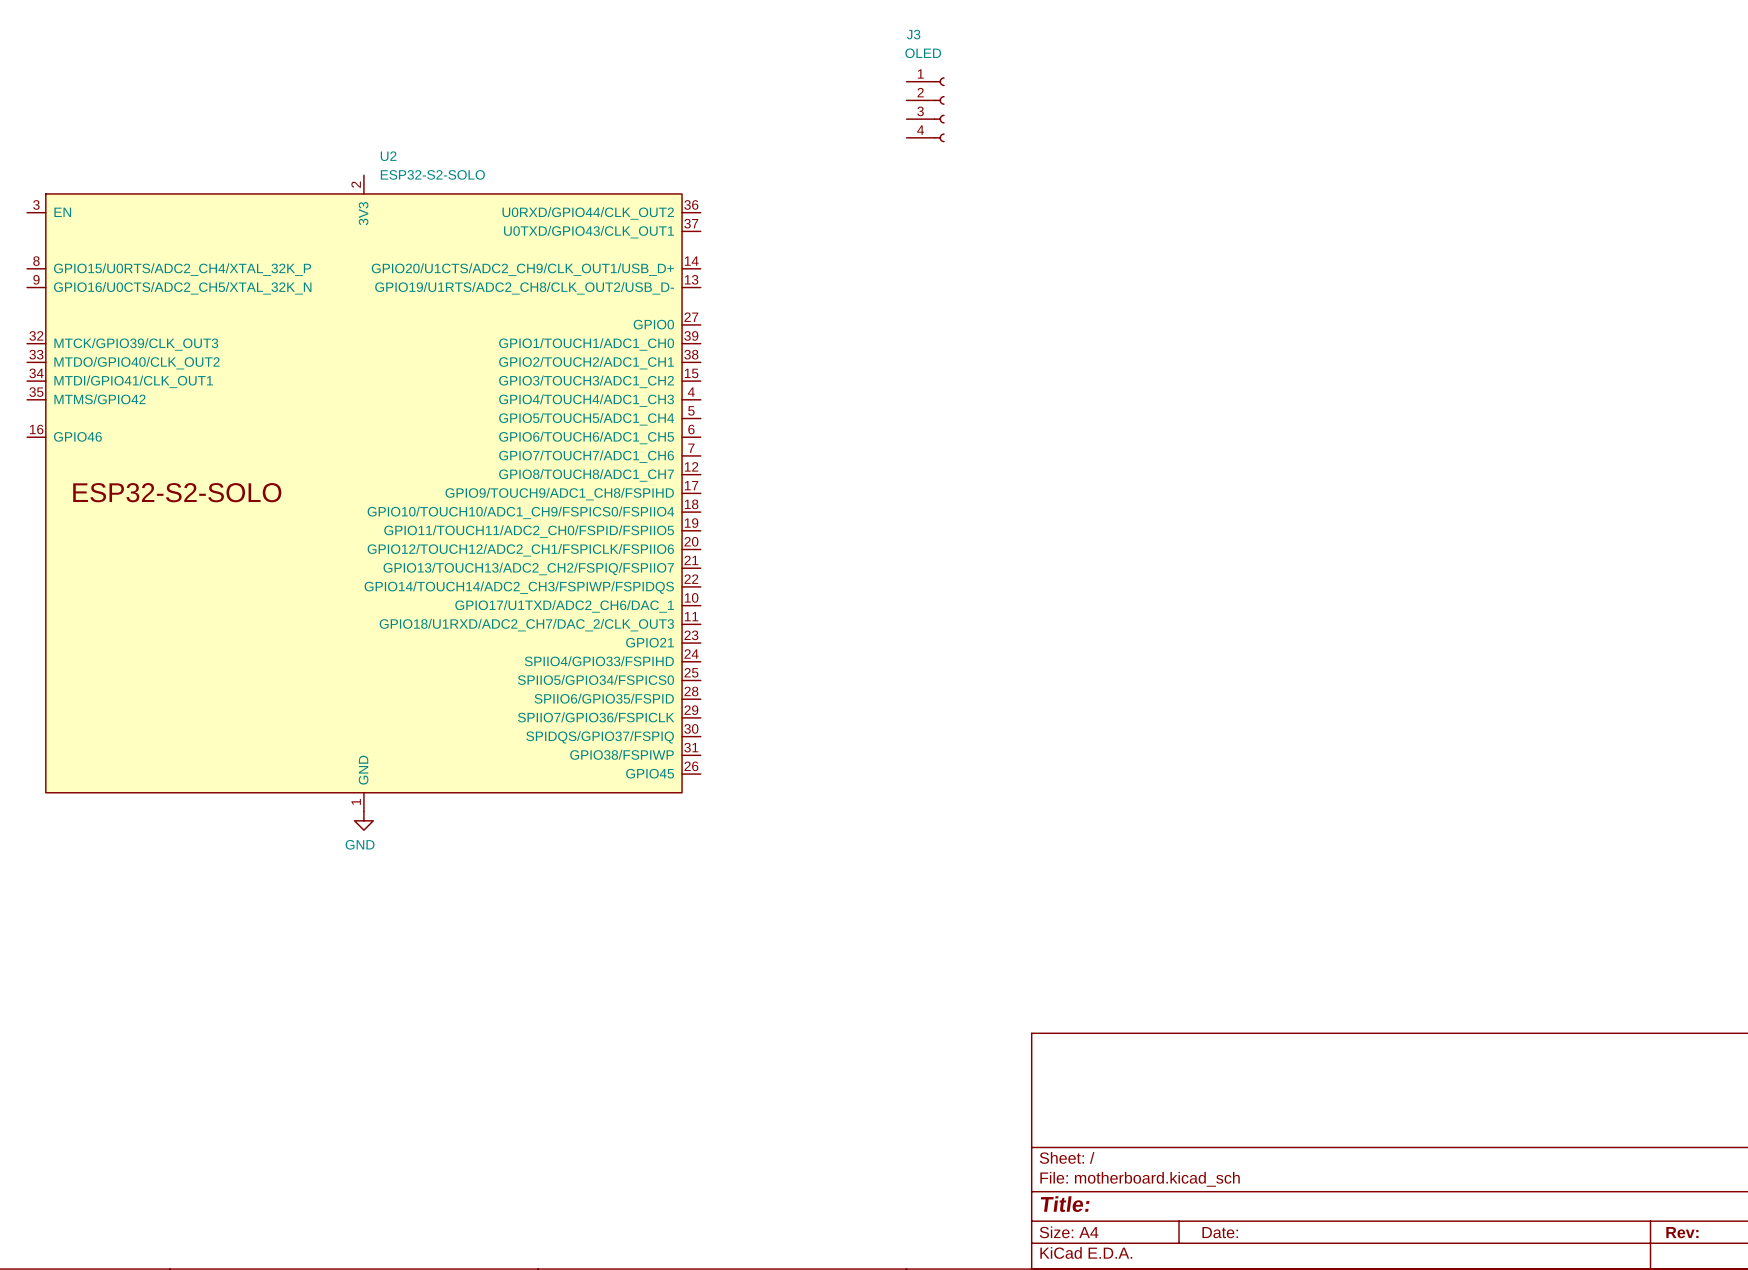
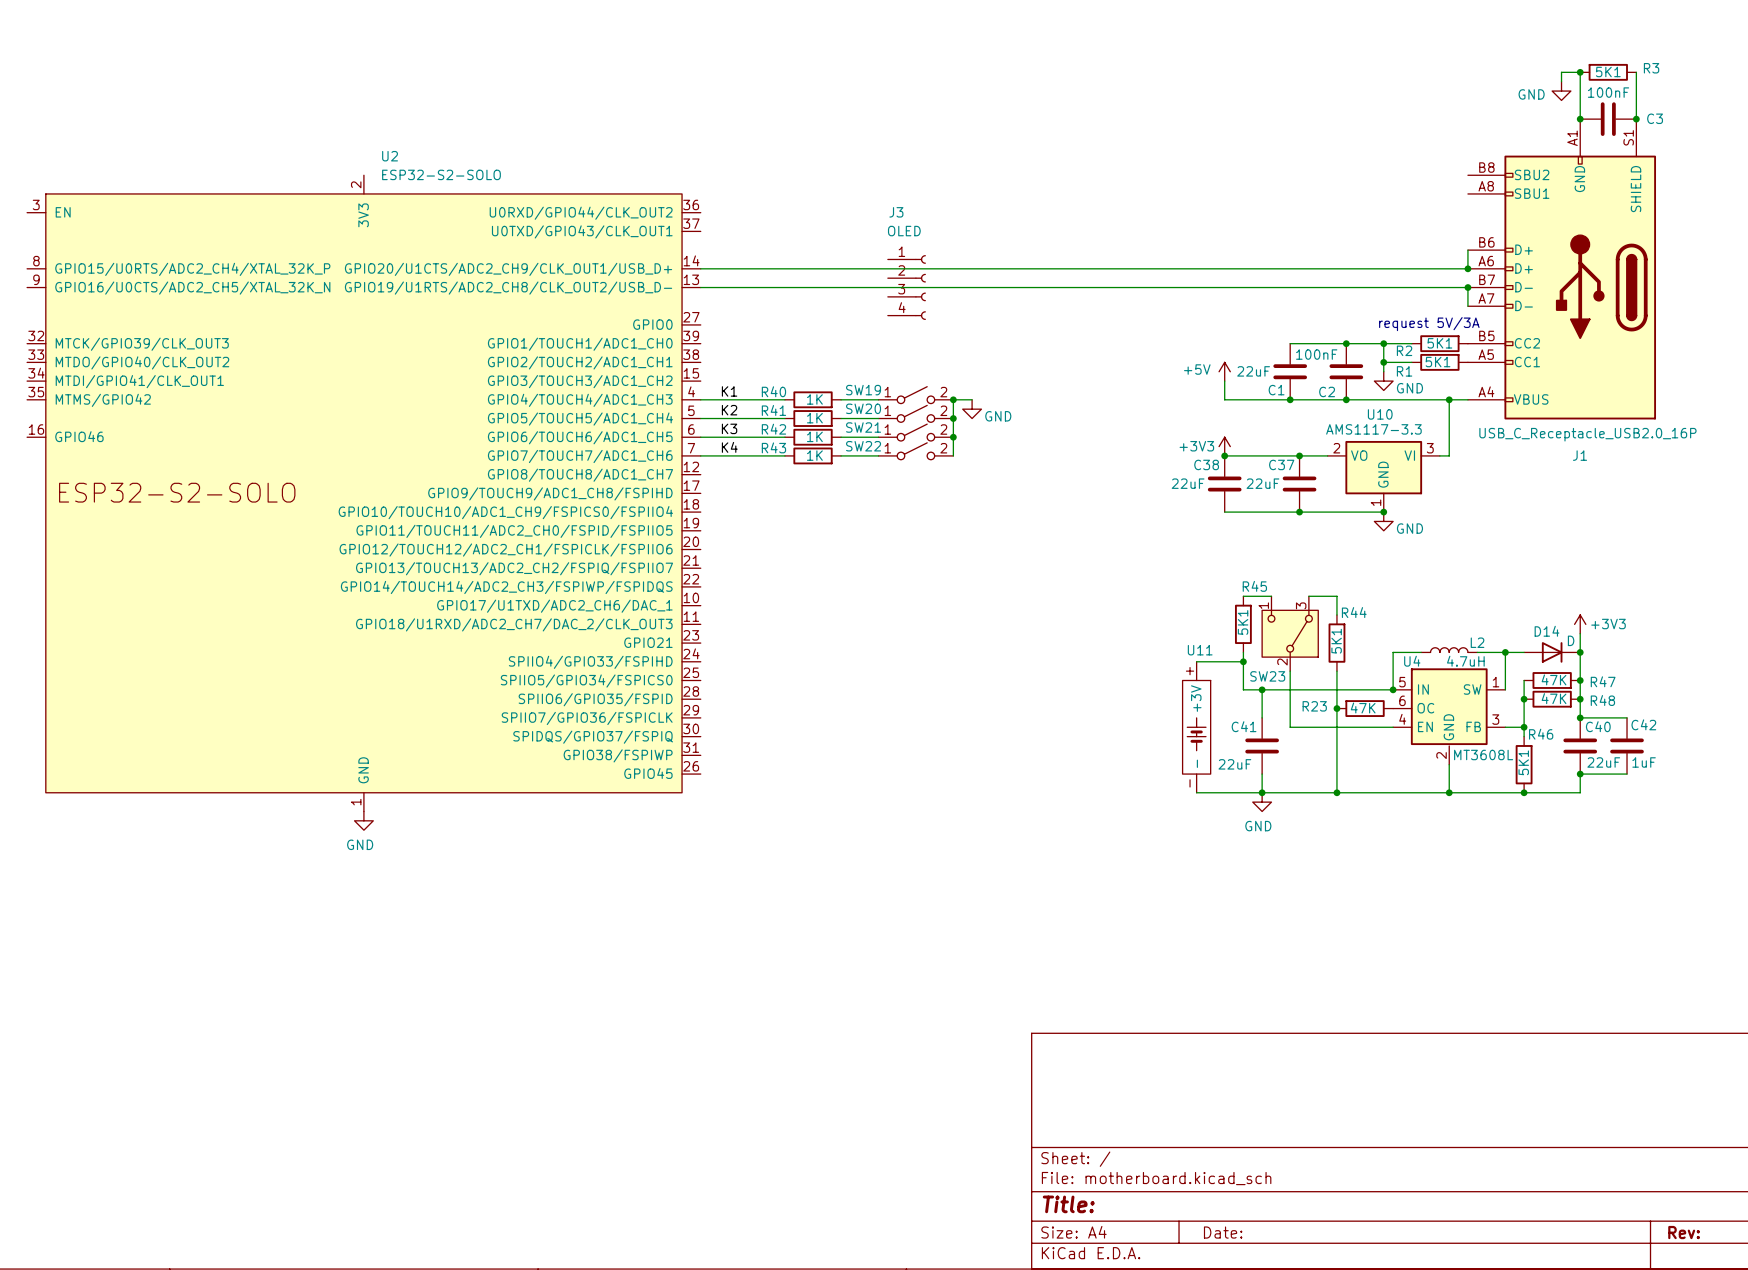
junction: none -> (1580, 72)
R3: none -> 5K1 (1608, 72)
wire: none -> (1636, 72) (1636, 119)
wire: none -> (1561, 81) (1561, 72) (1580, 72) (1580, 119)
power symbol: none -> GND (1561, 91)
J3 position: (925, 109) -> (906, 287)
junction: none -> (1580, 119)
C3: none -> 100nF (1608, 119)
junction: none -> (1636, 119)
wire: none -> (1467, 250) (1467, 268) (700, 268)
junction: none -> (1467, 268)
J1: none -> USB_C_Receptacle_USB2.0_16P (1561, 269)
wire: none -> (700, 287) (1467, 287) (1467, 306)
junction: none -> (1467, 287)
text: none -> request 5V/3A (1429, 324)
wire: none -> (1290, 343) (1411, 343)
junction: none -> (1346, 343)
wire: none -> (1383, 343) (1383, 371)
junction: none -> (1383, 343)
R2: none -> 5K1 (1439, 343)
wire: none -> (1383, 362) (1411, 362)
junction: none -> (1383, 362)
R1: none -> 5K1 (1439, 362)
power symbol: none -> +5V (1224, 371)
C1: none -> 22uF (1290, 371)
C2: none -> 100nF (1346, 371)
wire: none -> (1224, 381) (1224, 399) (1467, 399)
power symbol: none -> GND (1383, 381)
label: none -> K1 (729, 391)
SW19: none -> (915, 395)
wire: none -> (700, 399) (784, 399)
R40: none -> 1K (813, 399)
wire: none -> (841, 399) (878, 399)
junction: none -> (953, 399)
wire: none -> (972, 399) (953, 399) (953, 455)
junction: none -> (1290, 399)
junction: none -> (1346, 399)
wire: none -> (1449, 399) (1449, 455) (1439, 455)
junction: none -> (1449, 399)
power symbol: none -> GND (972, 409)
label: none -> K2 (729, 410)
SW20: none -> (915, 413)
wire: none -> (700, 418) (784, 418)
R41: none -> 1K (813, 418)
wire: none -> (841, 418) (878, 418)
junction: none -> (953, 418)
label: none -> K3 (729, 428)
SW21: none -> (915, 432)
wire: none -> (700, 437) (784, 437)
R42: none -> 1K (813, 437)
wire: none -> (841, 437) (878, 437)
junction: none -> (953, 437)
power symbol: none -> +3V3 (1224, 446)
label: none -> K4 (729, 447)
SW22: none -> (915, 451)
wire: none -> (700, 455) (784, 455)
R43: none -> 1K (813, 455)
wire: none -> (841, 455) (878, 455)
wire: none -> (1224, 455) (1327, 455)
junction: none -> (1224, 455)
junction: none -> (1299, 455)
U10: none -> AMS1117-3.3 (1383, 476)
C38: none -> 22uF (1224, 484)
C37: none -> 22uF (1299, 484)
wire: none -> (1224, 512) (1383, 512)
junction: none -> (1299, 512)
junction: none -> (1383, 512)
power symbol: none -> GND (1383, 521)
wire: none -> (1243, 596) (1271, 596)
wire: none -> (1308, 596) (1336, 596) (1336, 615)
R45: none -> 5K1 (1243, 624)
power symbol: none -> +3V3 (1580, 624)
SW23: none -> (1290, 633)
wire: none -> (1580, 633) (1580, 717) (1627, 717)
R44: none -> 5K1 (1336, 643)
L2: none -> 4.7uH (1449, 650)
wire: none -> (1243, 652) (1243, 689) (1393, 689) (1393, 652) (1421, 652)
wire: none -> (1477, 652) (1524, 652)
wire: none -> (1505, 652) (1505, 689)
junction: none -> (1505, 652)
D14: none -> D (1552, 652)
junction: none -> (1580, 652)
wire: none -> (1196, 661) (1243, 661)
junction: none -> (1243, 661)
wire: none -> (1290, 671) (1290, 727) (1393, 727)
wire: none -> (1336, 671) (1336, 792)
wire: none -> (1524, 680) (1524, 736)
R47: none -> 47K (1552, 680)
junction: none -> (1580, 680)
wire: none -> (1262, 689) (1262, 717)
junction: none -> (1262, 689)
junction: none -> (1393, 689)
junction: none -> (1524, 699)
R48: none -> 47K (1552, 699)
junction: none -> (1580, 699)
junction: none -> (1336, 708)
R23: none -> 47K (1365, 708)
U4: none -> MT3608L (1449, 716)
junction: none -> (1580, 717)
U11: none -> (1196, 727)
wire: none -> (1505, 727) (1524, 727)
junction: none -> (1524, 727)
C41: none -> 22uF (1262, 745)
C40: none -> 22uF (1580, 745)
C42: none -> 1uF (1627, 745)
wire: none -> (1449, 764) (1449, 792)
R46: none -> 5K1 (1524, 764)
wire: none -> (1262, 774) (1262, 792)
junction: none -> (1580, 774)
wire: none -> (1627, 774) (1580, 774) (1580, 792) (1196, 792)
junction: none -> (1262, 792)
junction: none -> (1336, 792)
junction: none -> (1449, 792)
junction: none -> (1524, 792)
power symbol: none -> GND (1262, 802)

